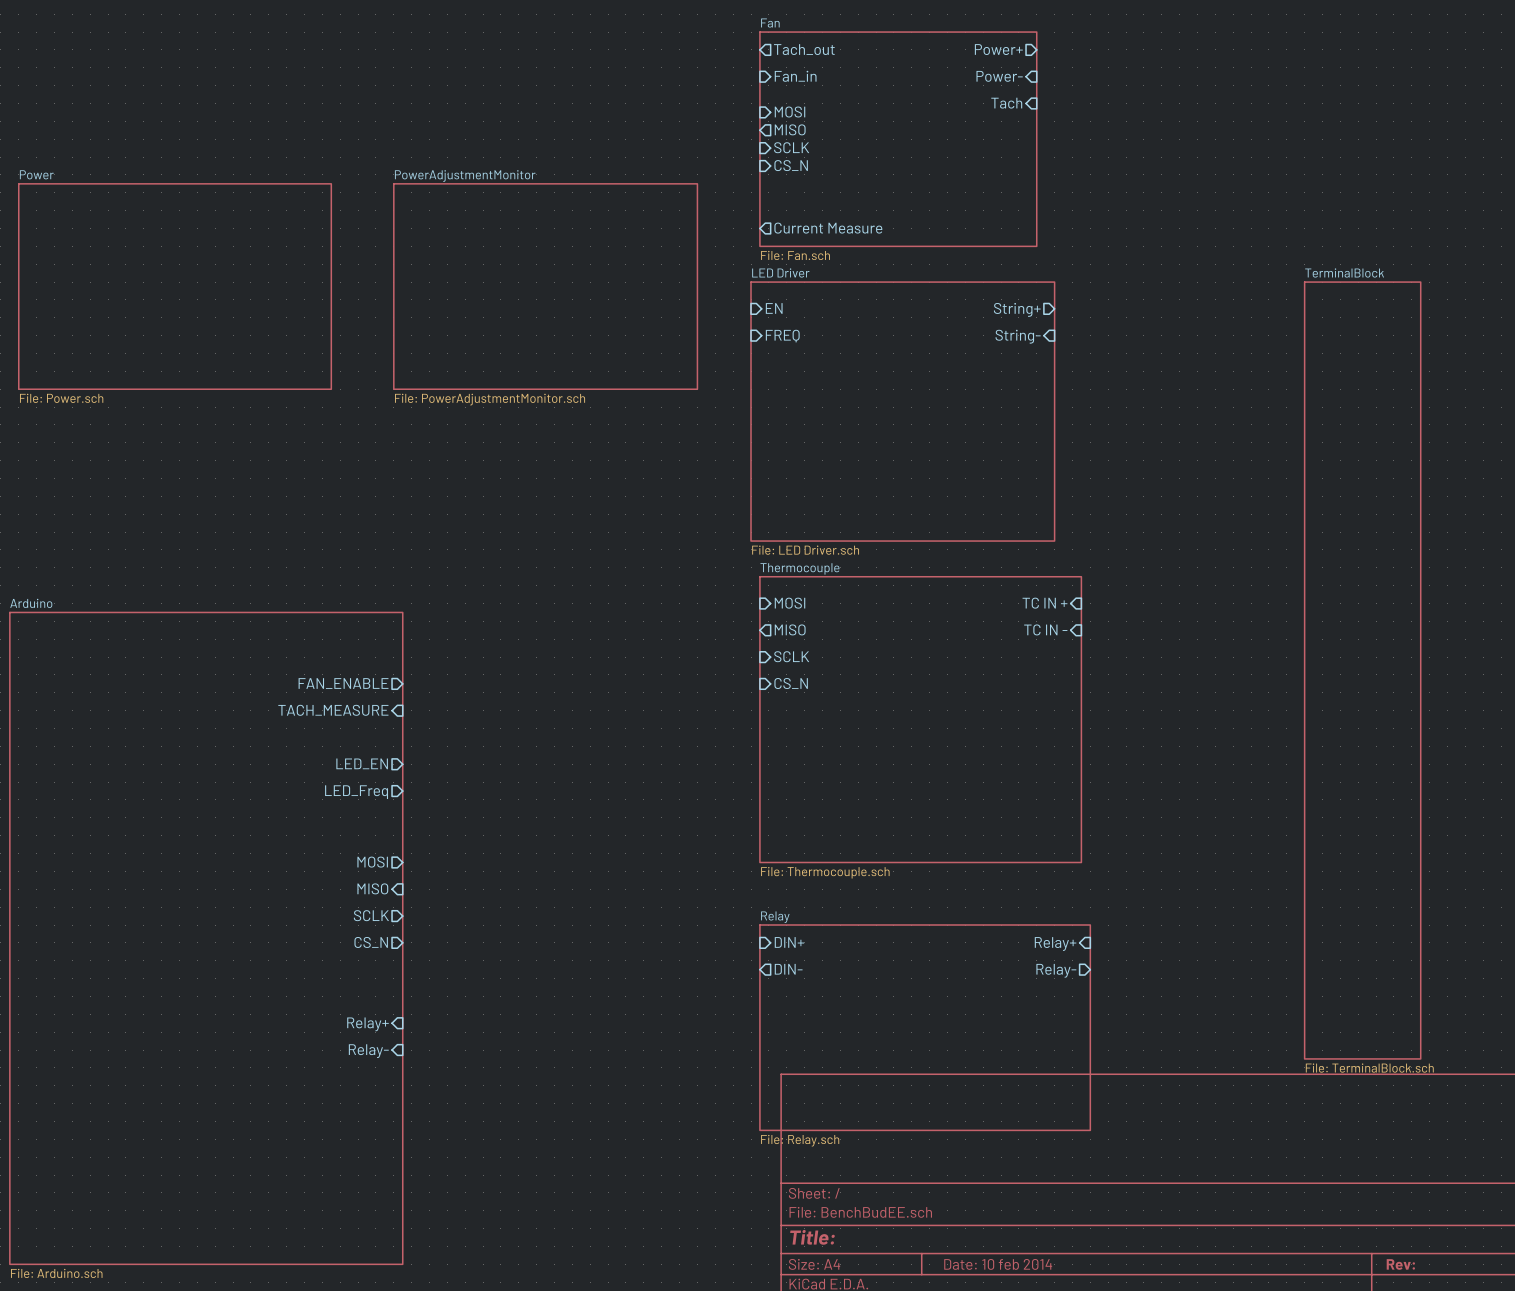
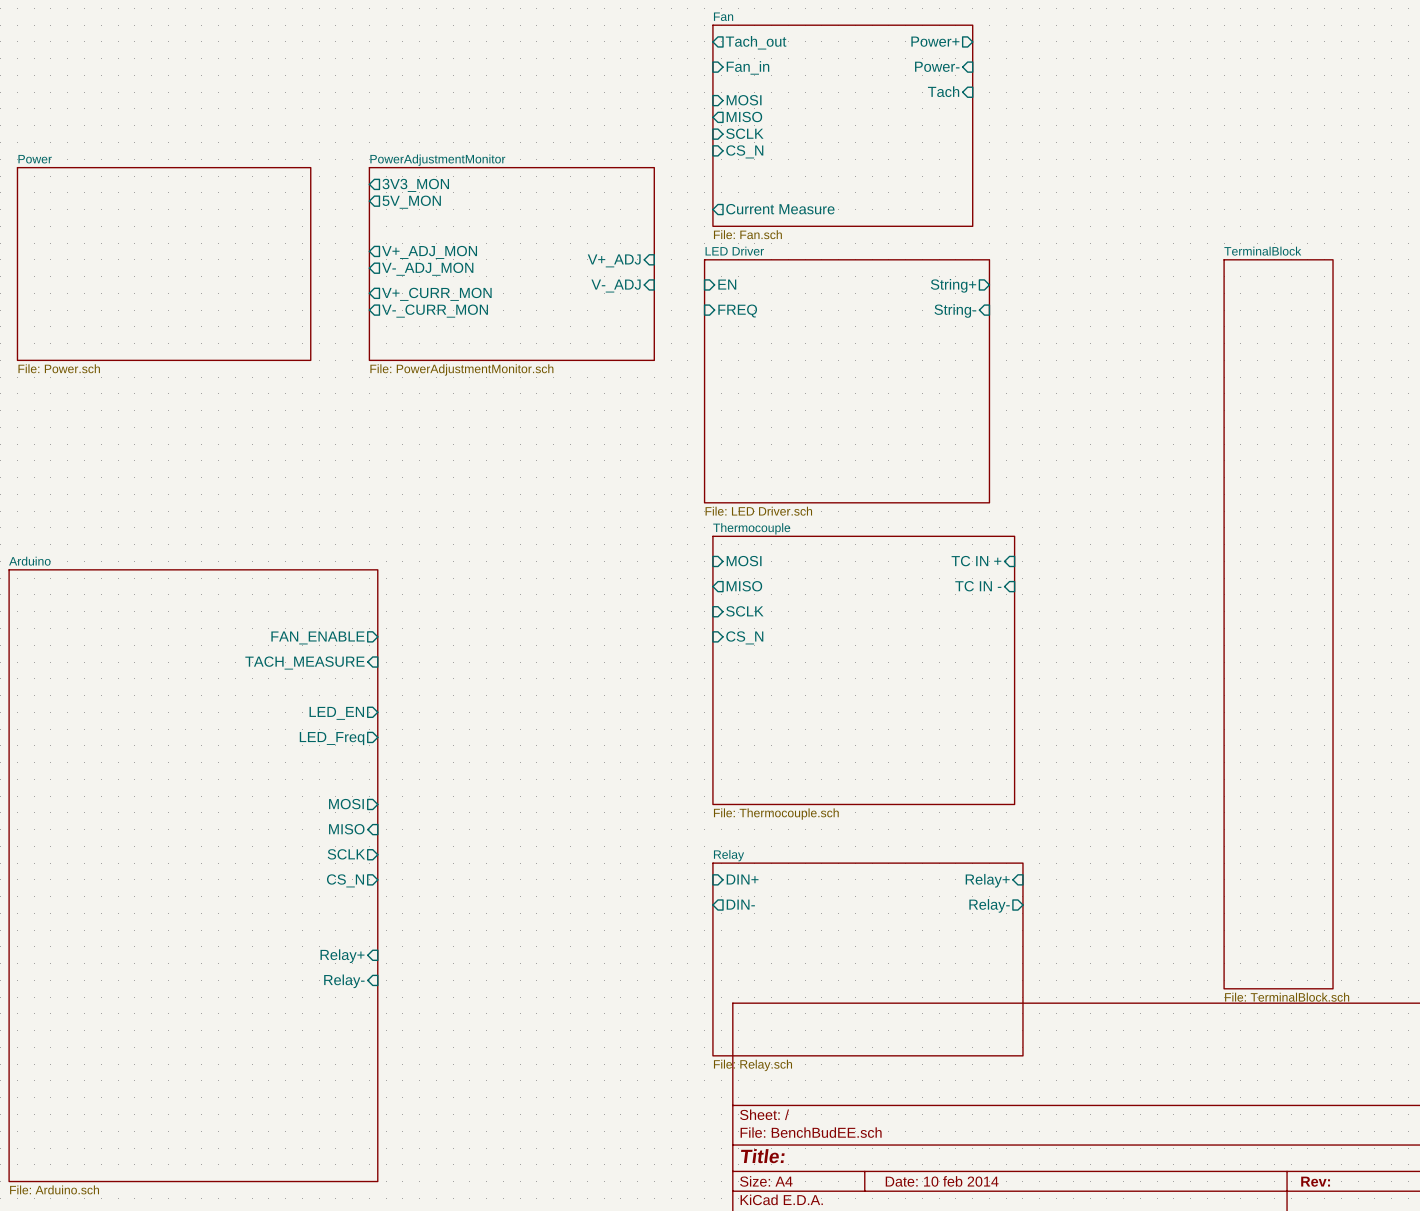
sheet pin: none -> 3V3_MON (415, 185)
sheet pin: none -> 5V_MON (411, 202)
sheet pin: none -> V+_ADJ_MON (429, 252)
sheet pin: none -> V+_ADJ (614, 260)
sheet pin: none -> V-_ADJ_MON (427, 269)
sheet pin: none -> V-_ADJ (616, 286)
sheet pin: none -> V+_CURR_MON (436, 294)
sheet pin: none -> V-_CURR_MON (435, 311)

